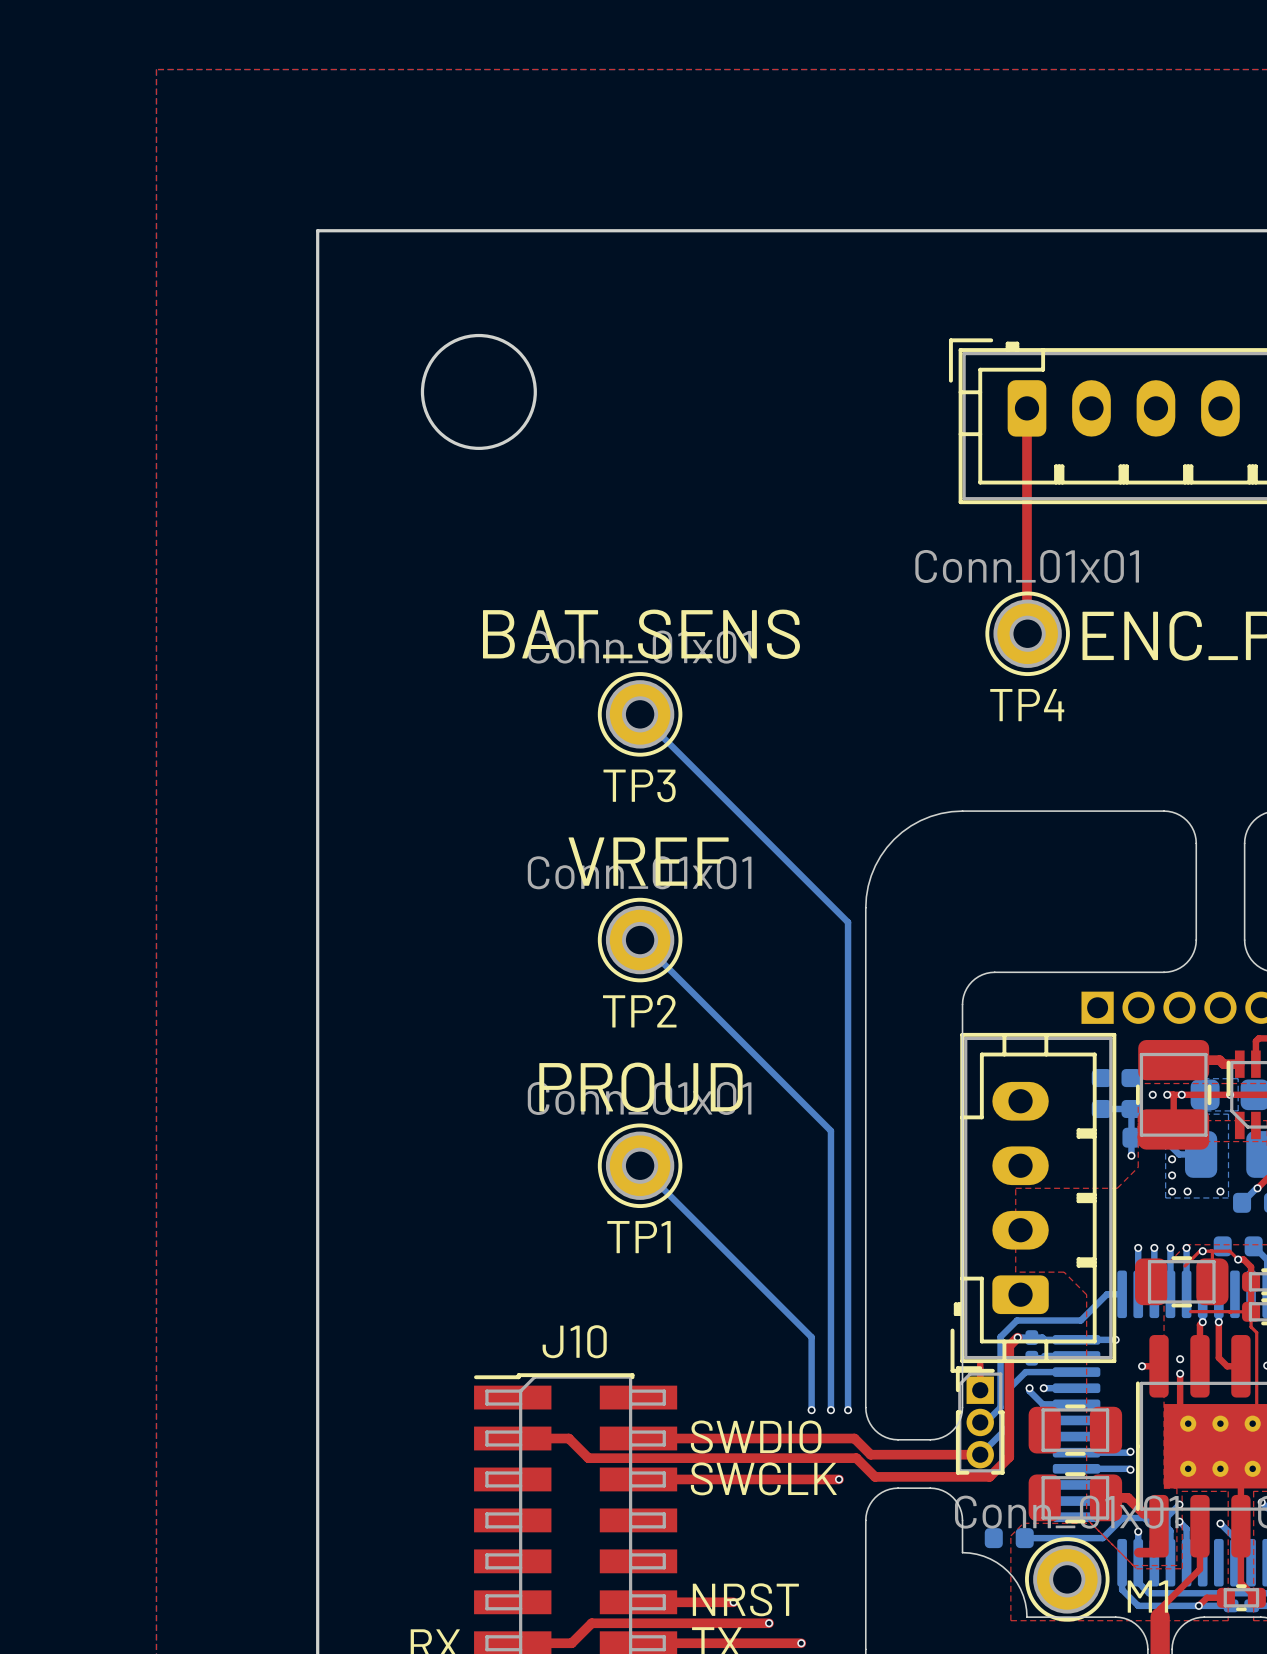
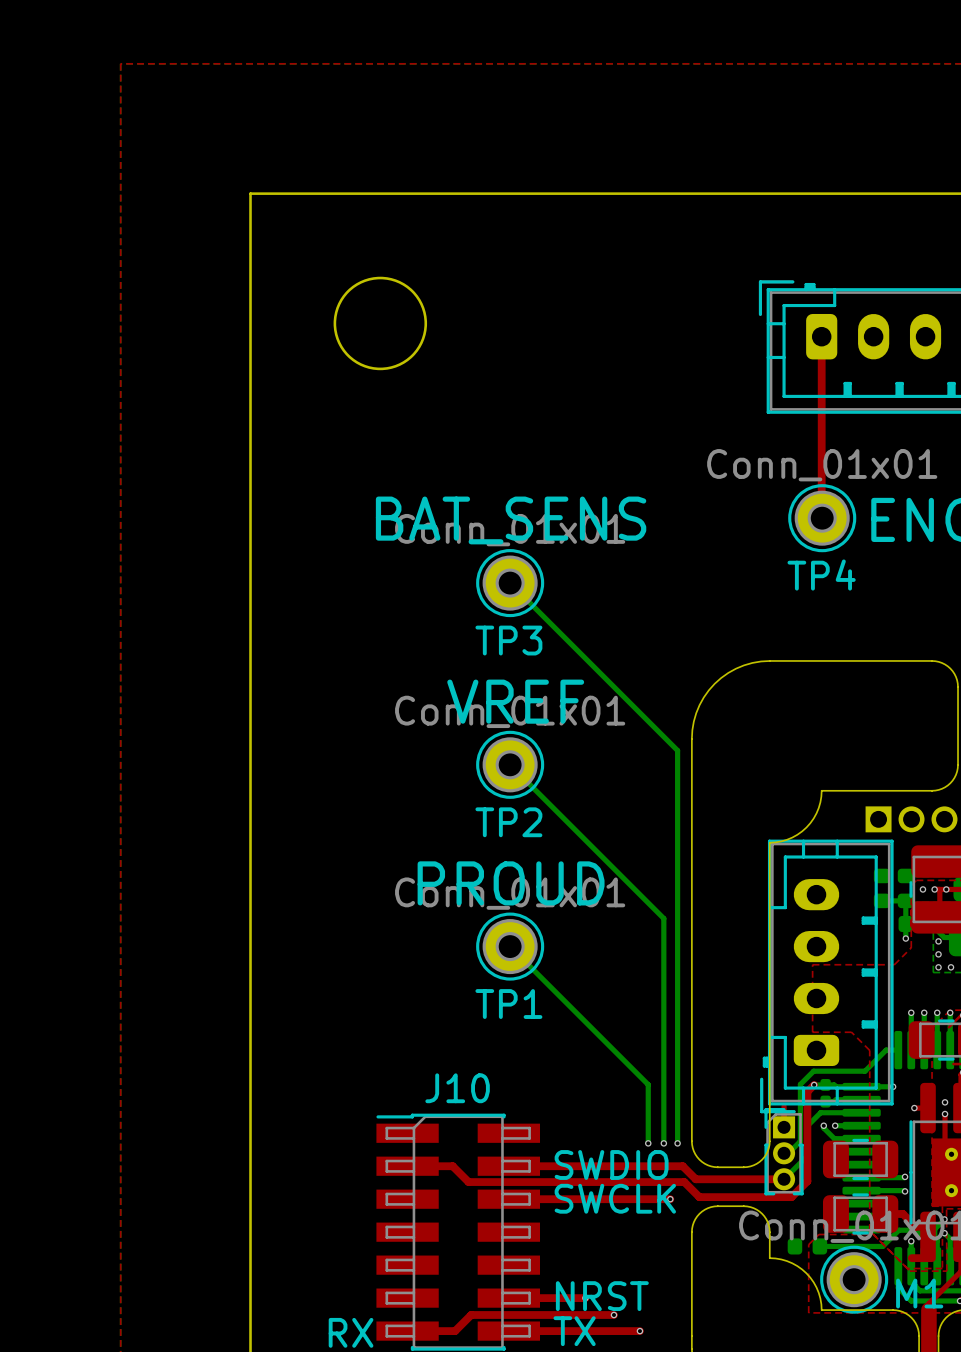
board edge: (1026, 972) (990, 972) (982, 974) (971, 981) (964, 992) (962, 1000) (962, 1036) -> (821, 790) (818, 807) (806, 827) (792, 837) (769, 842)

